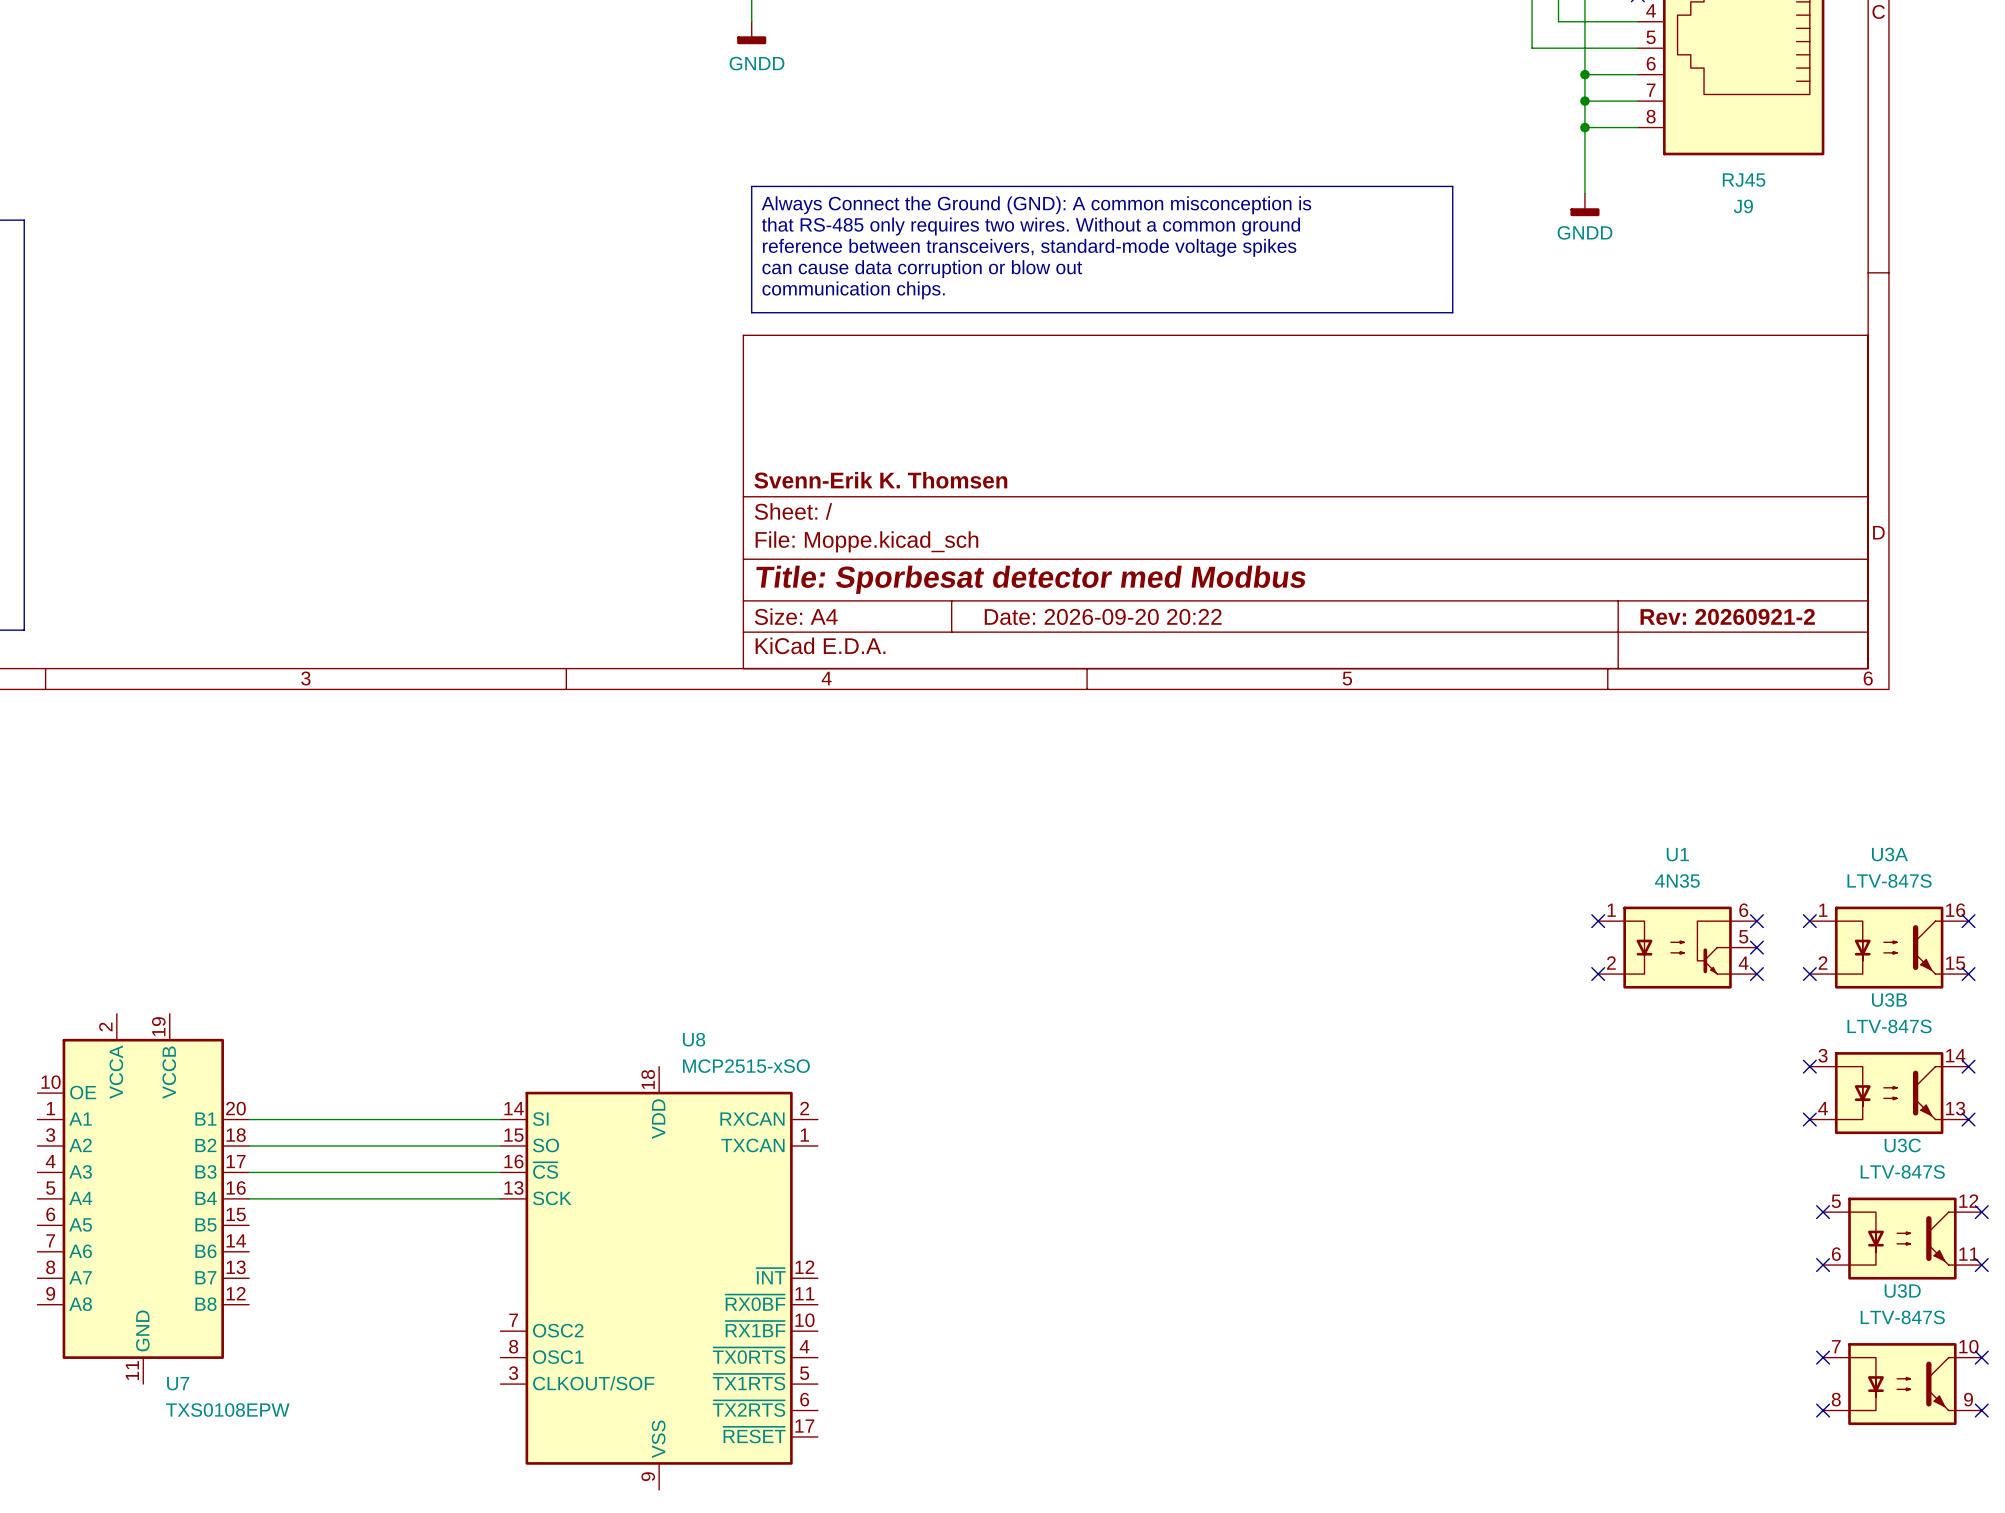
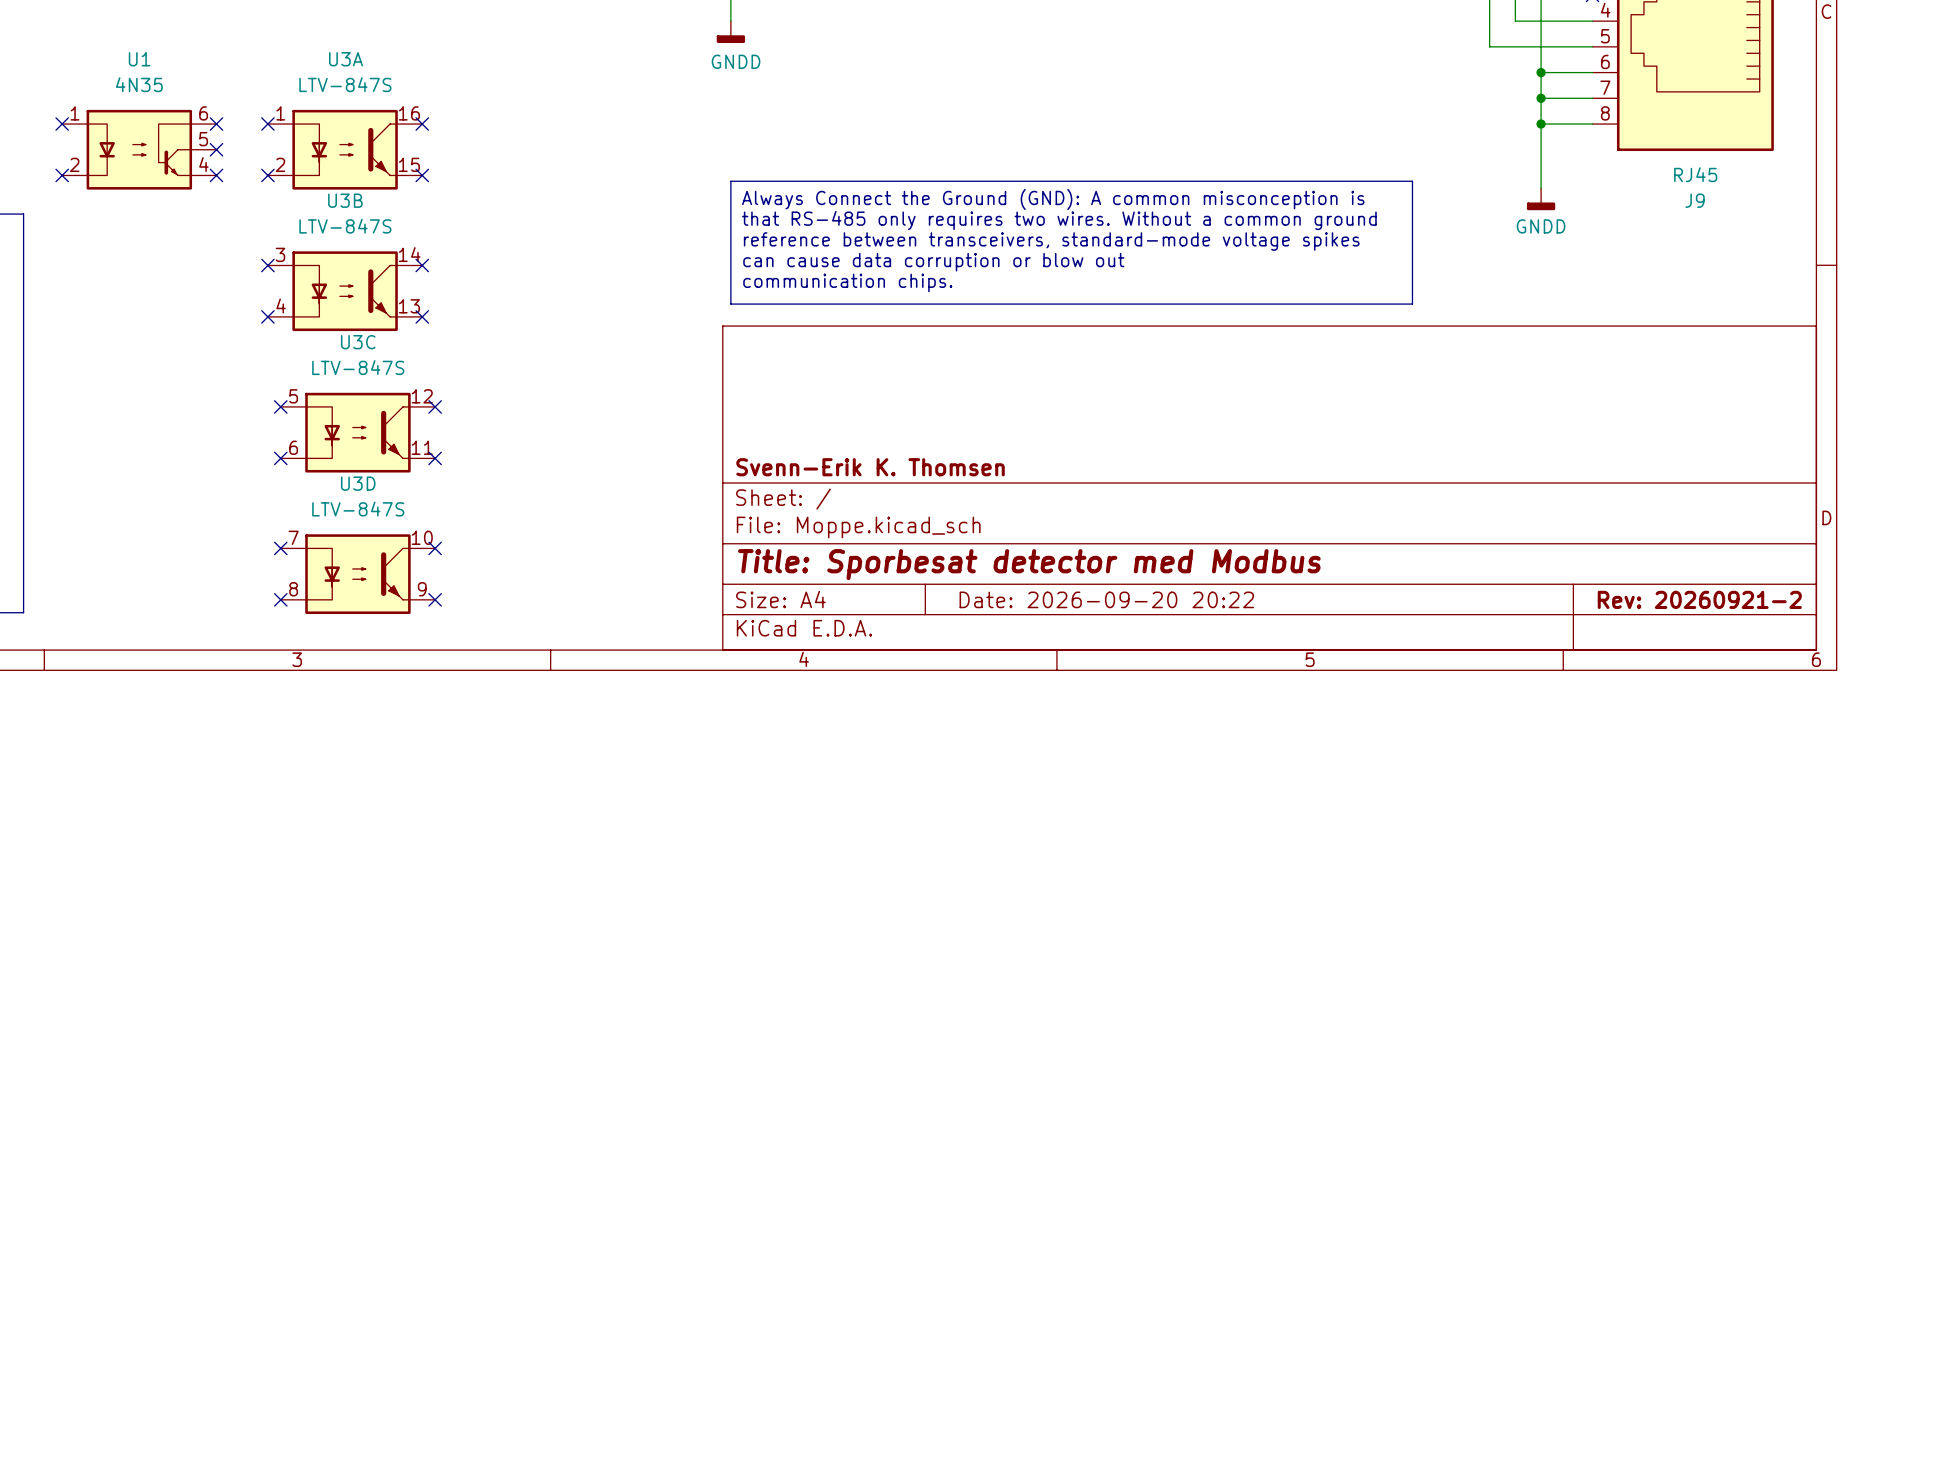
no-connect mark: none -> (62, 124)
no-connect mark: none -> (216, 124)
no-connect mark: none -> (267, 124)
no-connect mark: none -> (422, 124)
no-connect mark: none -> (216, 149)
no-connect mark: none -> (62, 175)
no-connect mark: none -> (216, 175)
no-connect mark: none -> (267, 175)
no-connect mark: none -> (422, 175)
no-connect mark: none -> (267, 265)
no-connect mark: none -> (422, 265)
no-connect mark: none -> (267, 316)
no-connect mark: none -> (422, 316)
no-connect mark: none -> (280, 406)
no-connect mark: none -> (435, 406)
no-connect mark: none -> (280, 458)
no-connect mark: none -> (435, 458)
no-connect mark: none -> (280, 548)
no-connect mark: none -> (435, 548)
no-connect mark: none -> (280, 599)
no-connect mark: none -> (435, 599)
no-connect mark: (1598, 921) -> none
no-connect mark: (1756, 921) -> none
no-connect mark: (1809, 921) -> none
no-connect mark: (1968, 921) -> none
U1 position: (1677, 947) -> (139, 149)
no-connect mark: (1756, 947) -> none
U3A position: (1889, 947) -> (345, 149)
no-connect mark: (1598, 974) -> none
no-connect mark: (1756, 974) -> none
no-connect mark: (1809, 974) -> none
no-connect mark: (1968, 974) -> none
no-connect mark: (1809, 1066) -> none
no-connect mark: (1968, 1066) -> none
U3B position: (1889, 1093) -> (345, 291)
wire: (249, 1119) (500, 1119) -> none
no-connect mark: (1809, 1119) -> none
no-connect mark: (1968, 1119) -> none
wire: (249, 1145) (500, 1145) -> none
wire: (249, 1172) (500, 1172) -> none
U7: TXS0108EPW (143, 1198) -> none
wire: (249, 1198) (500, 1198) -> none
no-connect mark: (1823, 1212) -> none
no-connect mark: (1981, 1212) -> none
U3C position: (1902, 1238) -> (357, 432)
no-connect mark: (1823, 1265) -> none
no-connect mark: (1981, 1265) -> none
U8: MCP2515-xSO (659, 1278) -> none
no-connect mark: (1823, 1357) -> none
no-connect mark: (1981, 1357) -> none
U3D position: (1902, 1384) -> (357, 574)
no-connect mark: (1823, 1410) -> none
no-connect mark: (1981, 1410) -> none

